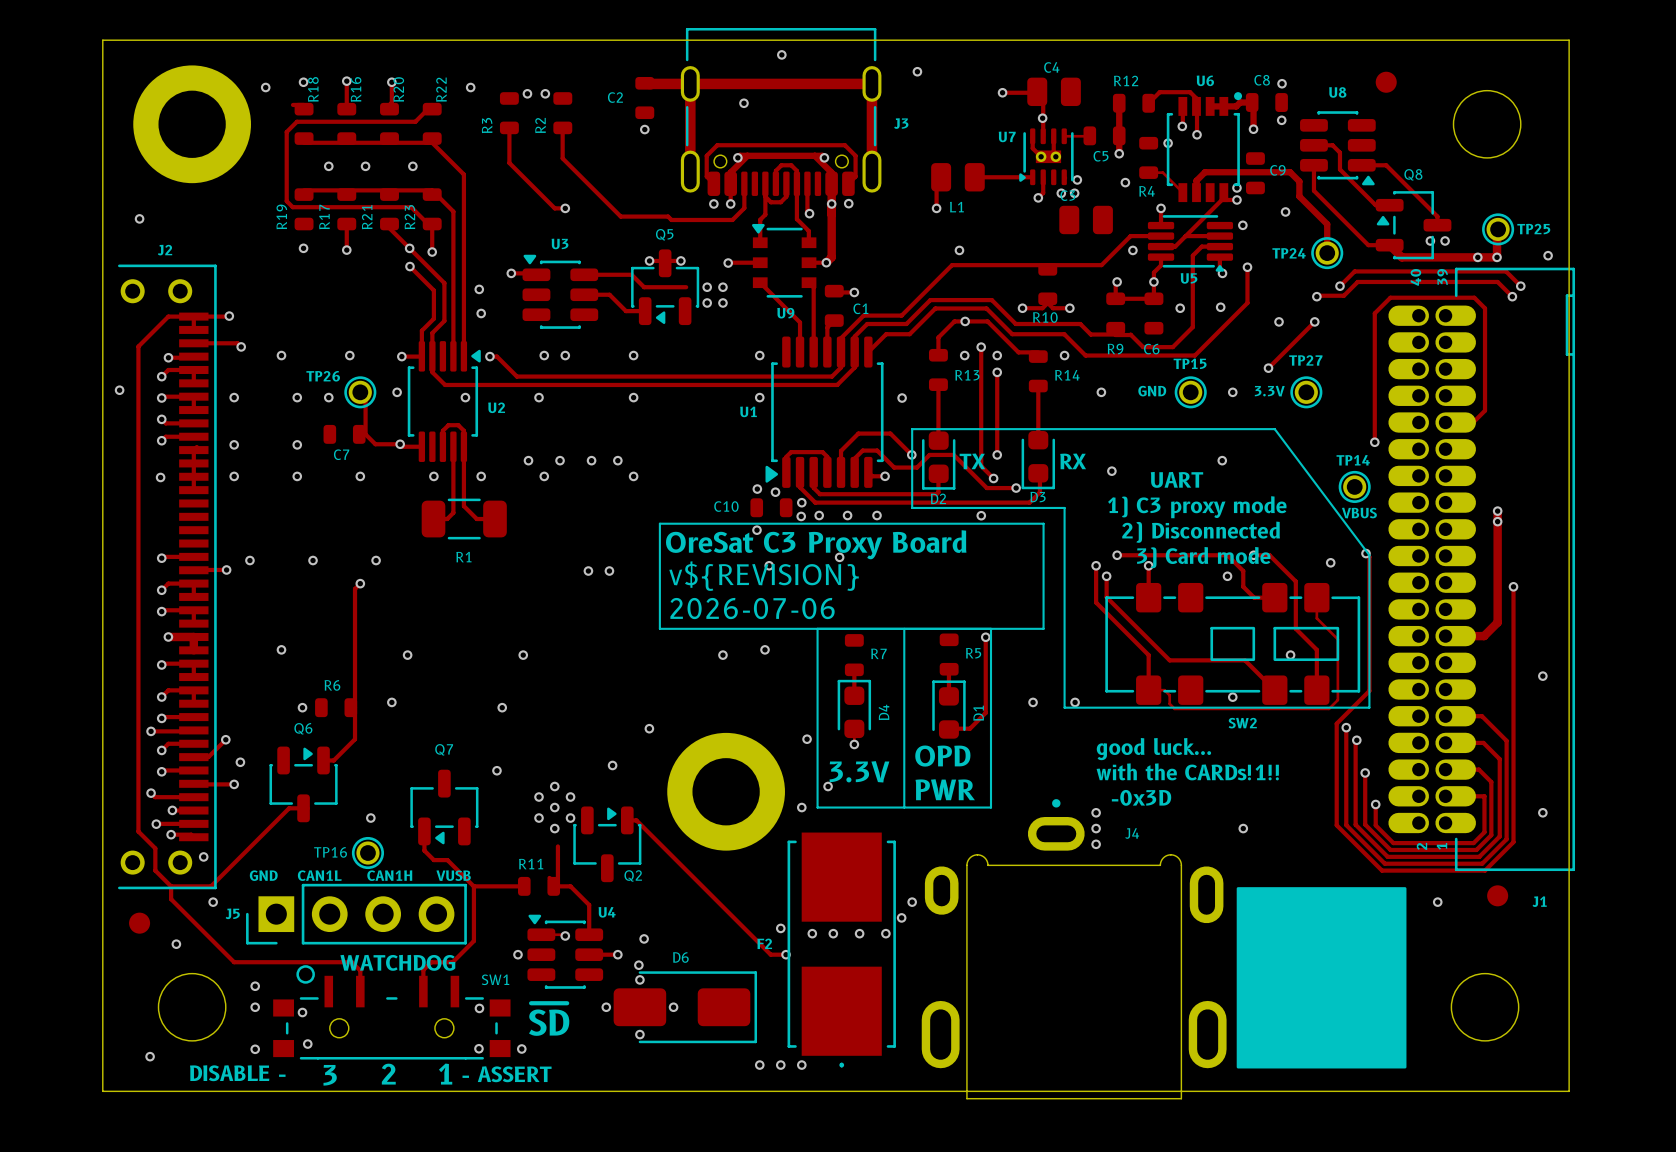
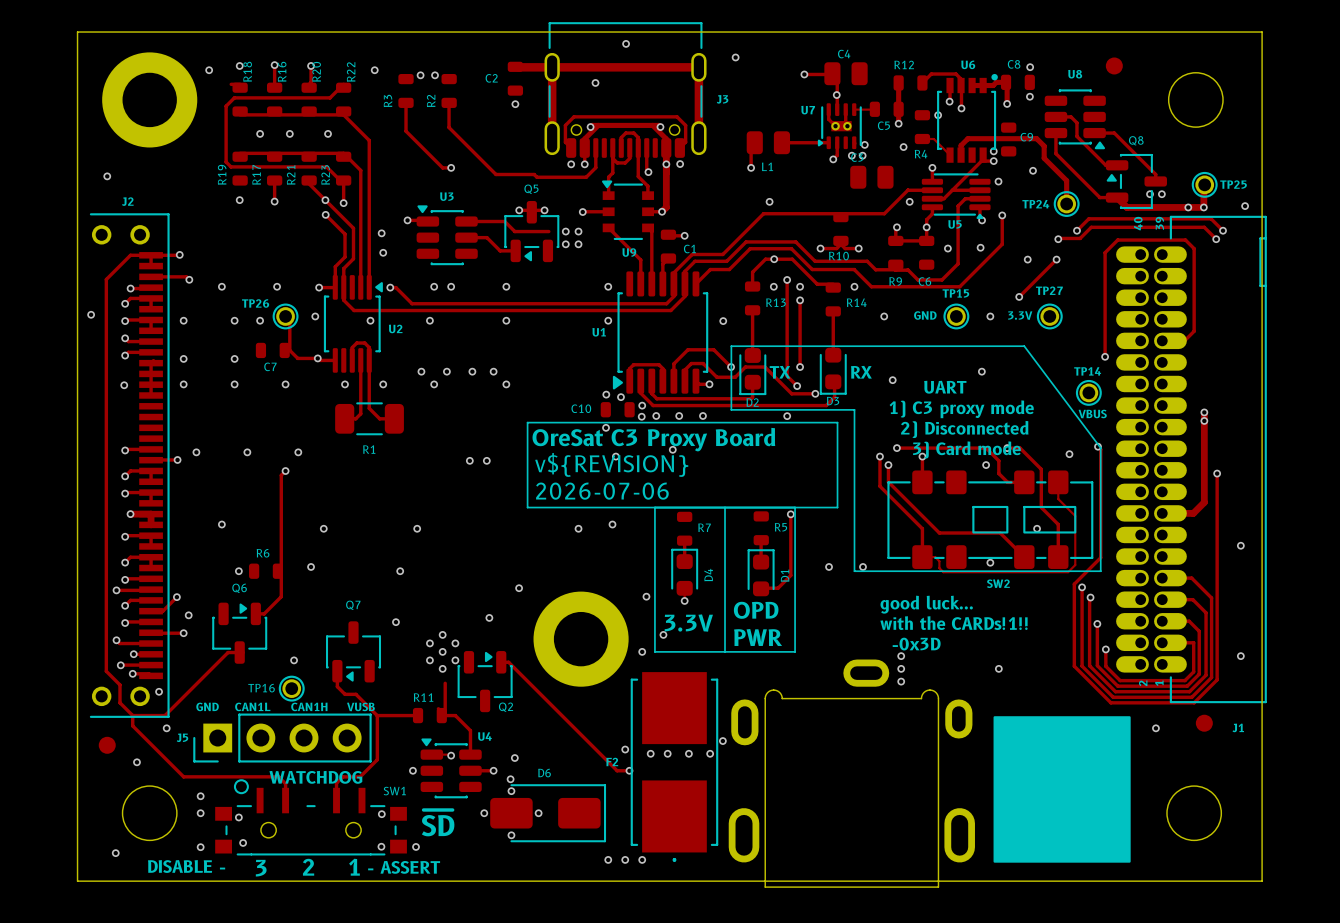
via: (1096, 812) -> none
via: none -> (901, 656)
via: (1096, 828) -> none
via: none -> (901, 668)
via: (1096, 844) -> none
via: none -> (901, 681)
via: (912, 902) -> none
J4 side: top (1074, 948) -> bottom (851, 773)

